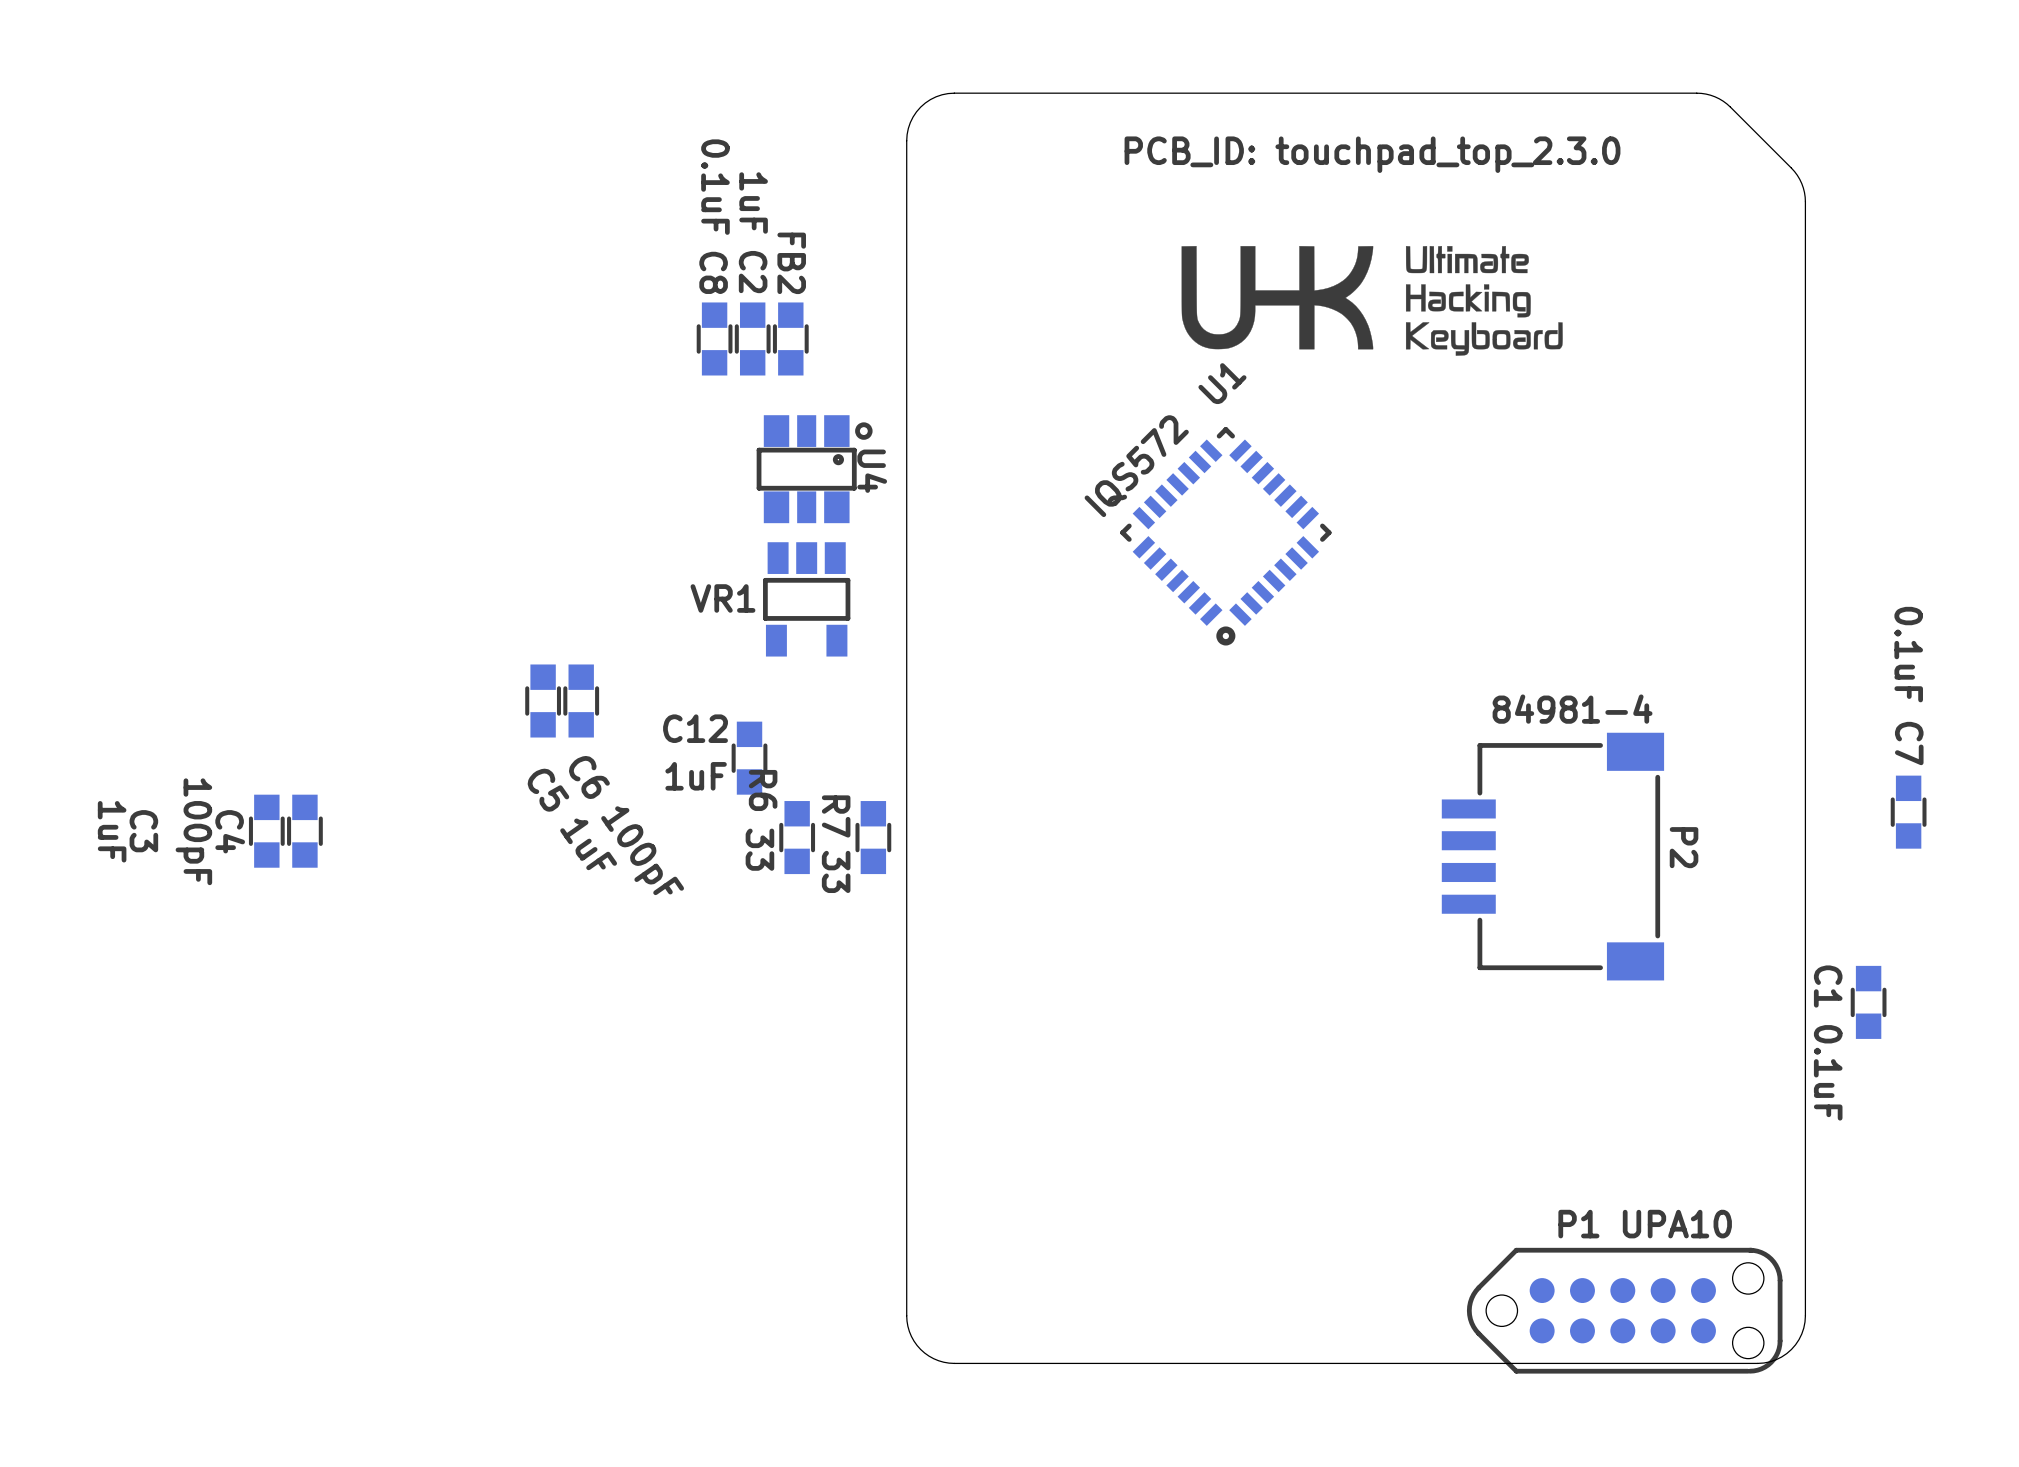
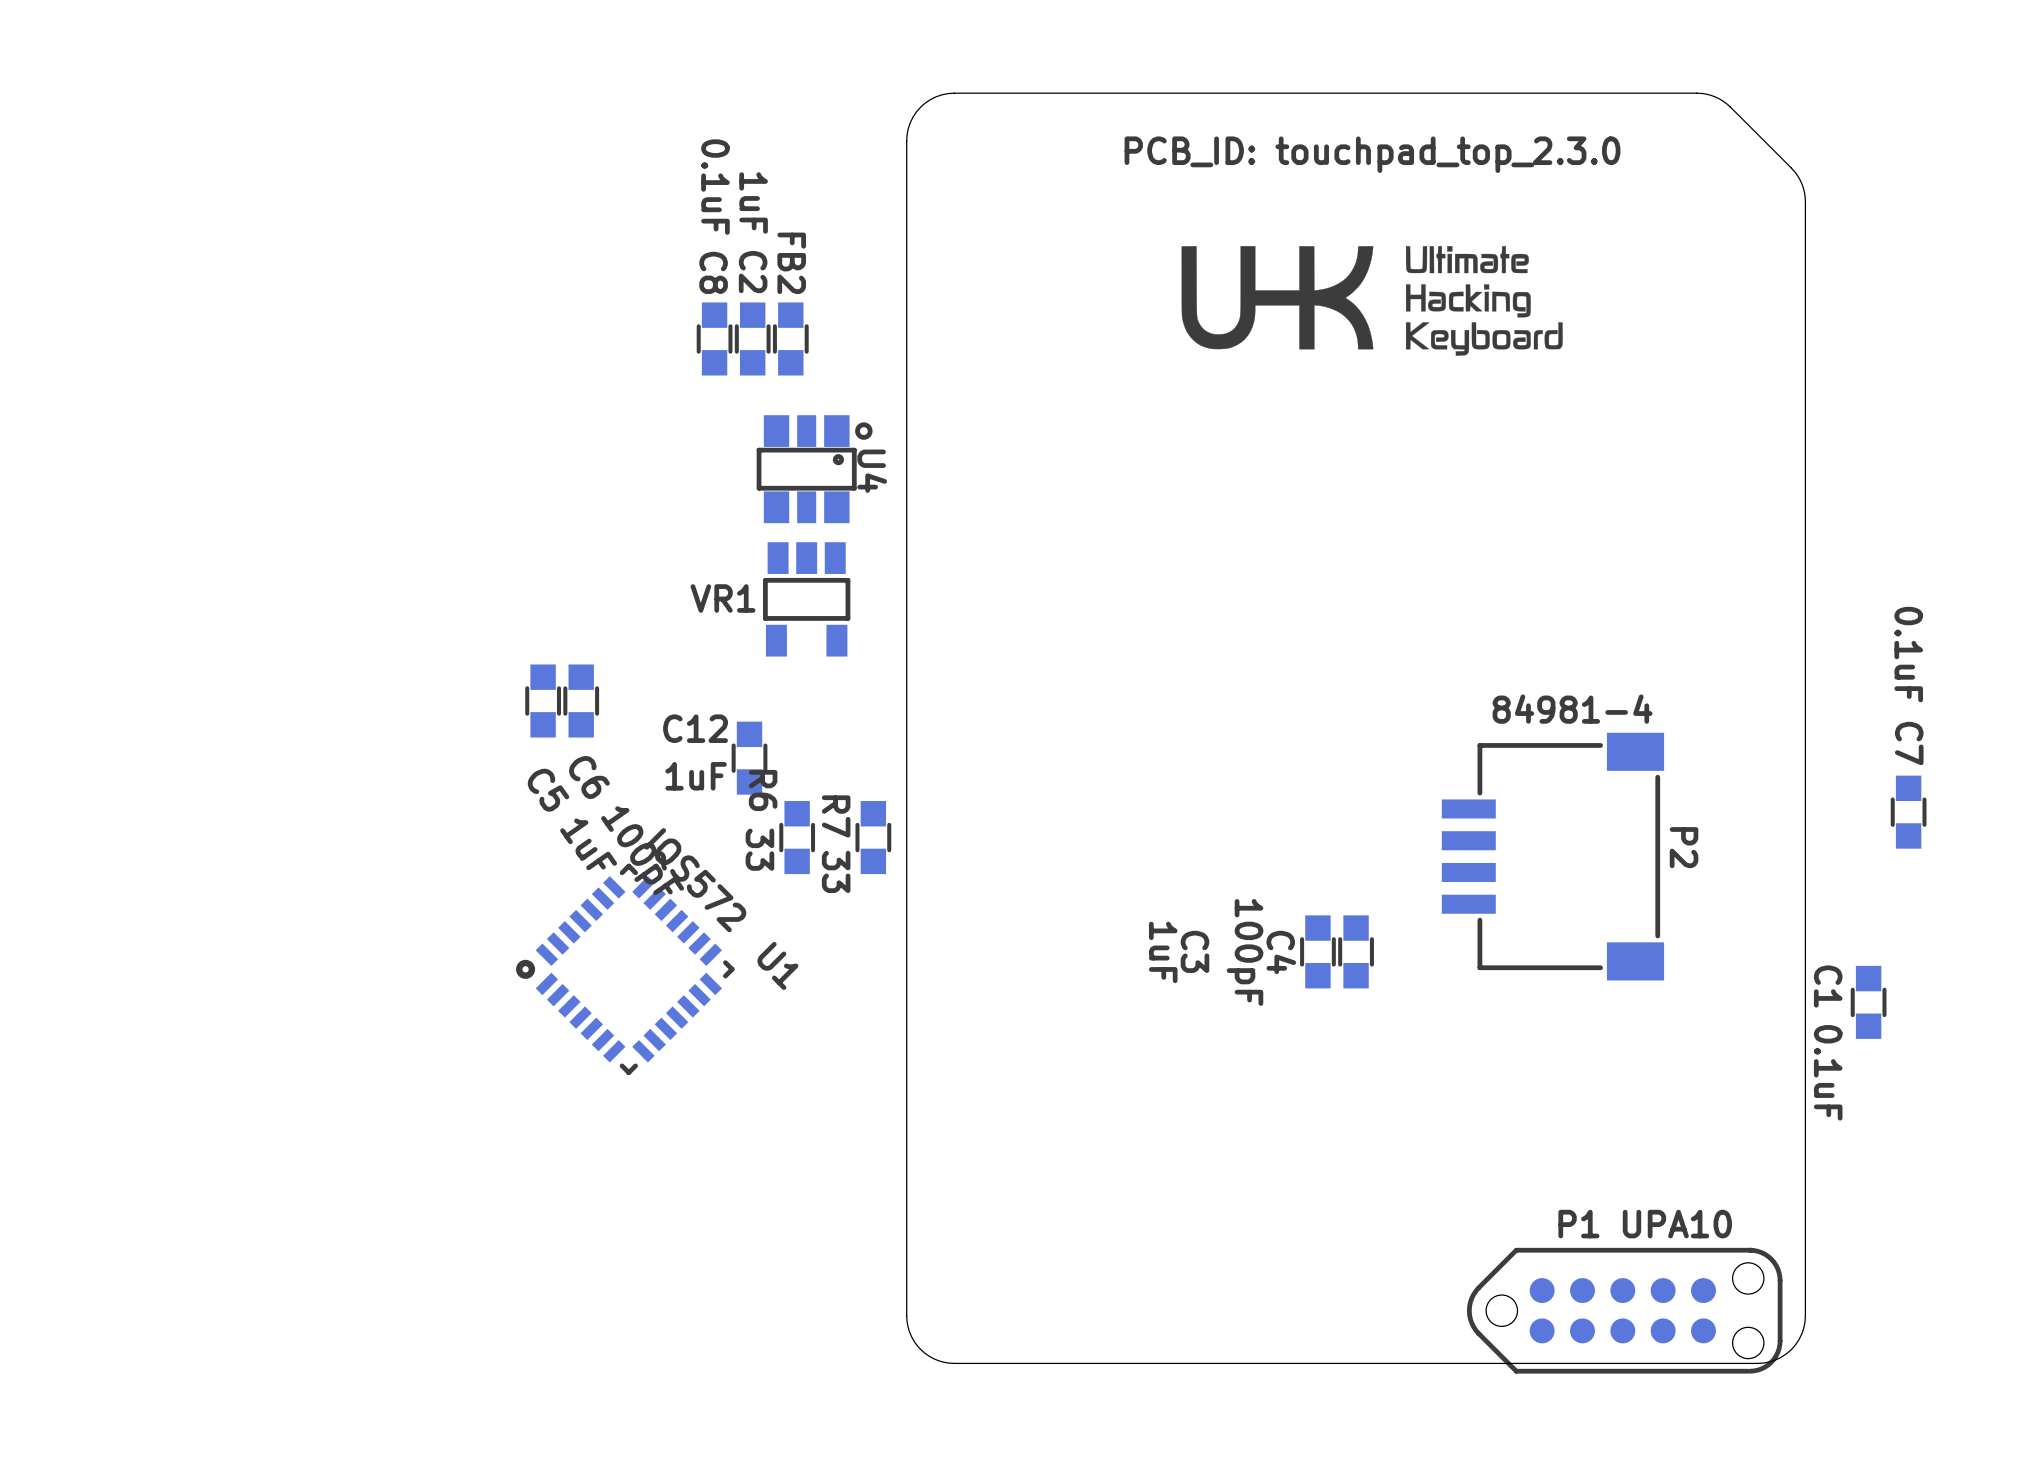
U1 rotation: 0° (1225, 536) -> 90° clockwise (625, 969)
U1 position: (1225, 536) -> (625, 969)
C3 position: (266, 831) -> (1317, 951)
C4 position: (304, 831) -> (1356, 951)

